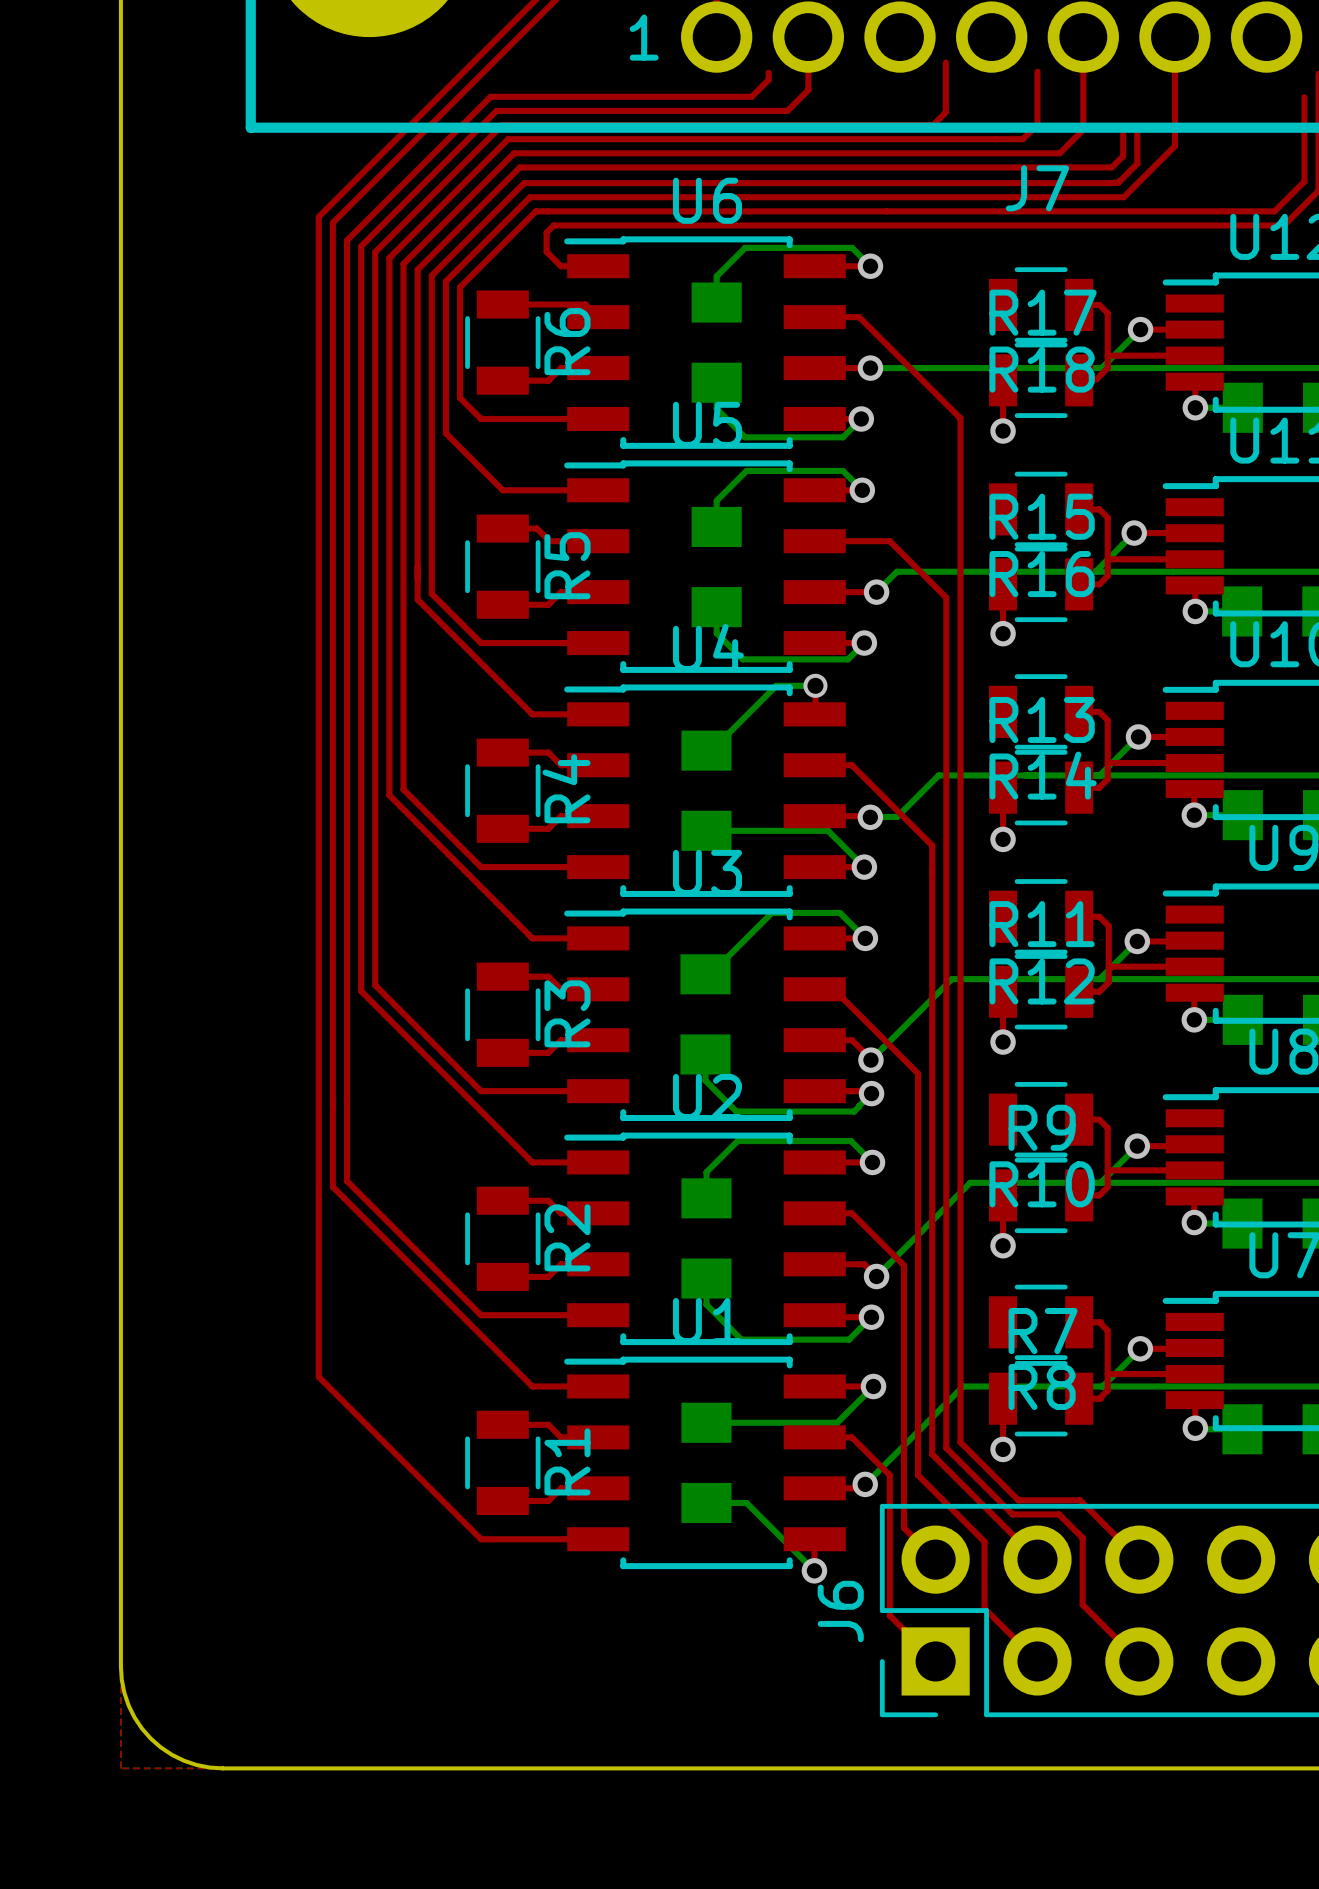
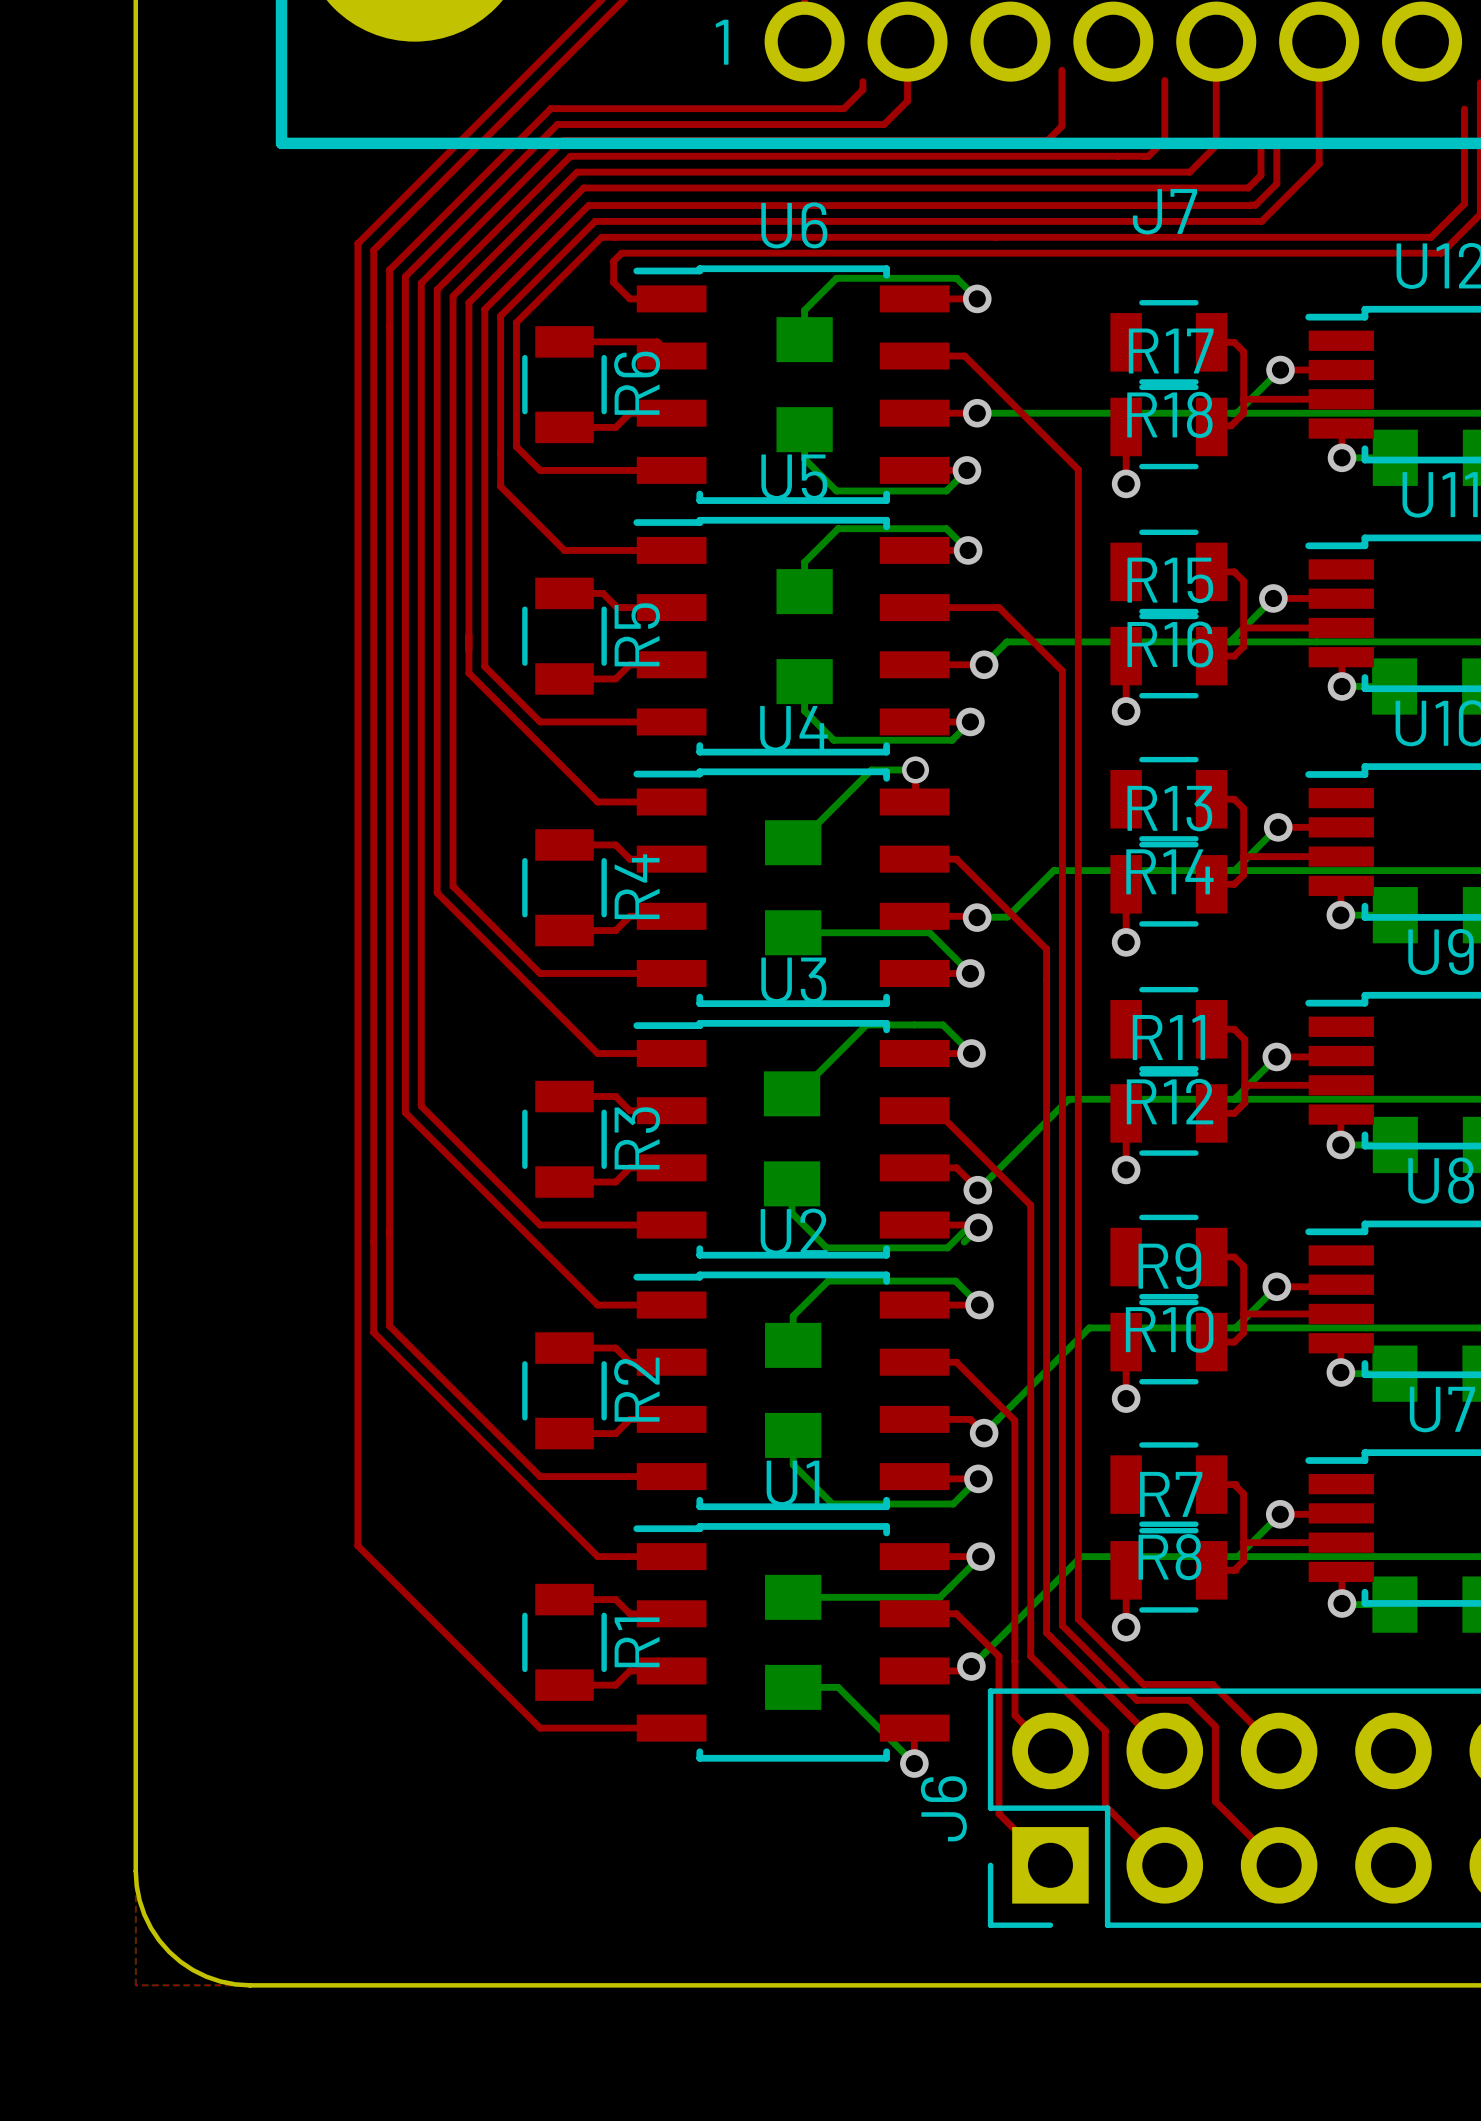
bottom track: (858, 1106) (854, 1111) (843, 1111) -> (970, 1225) (947, 1247)

